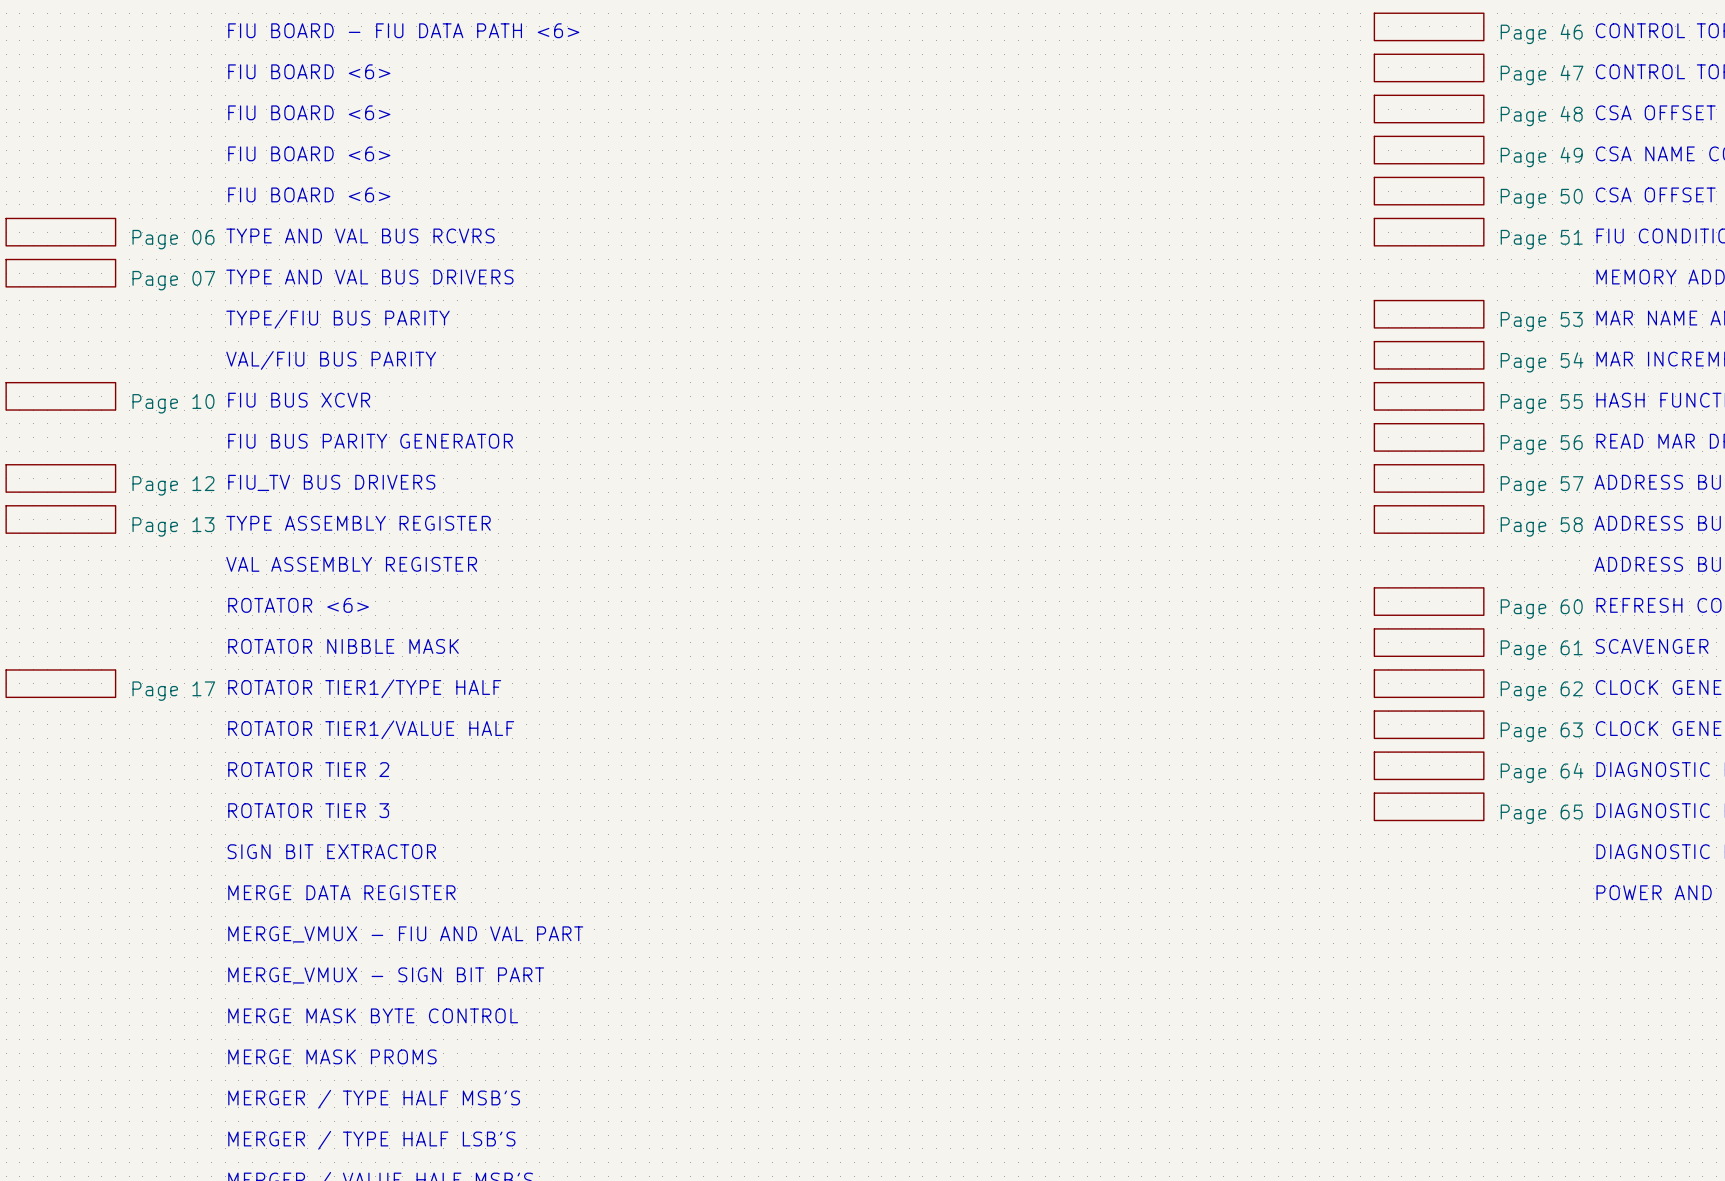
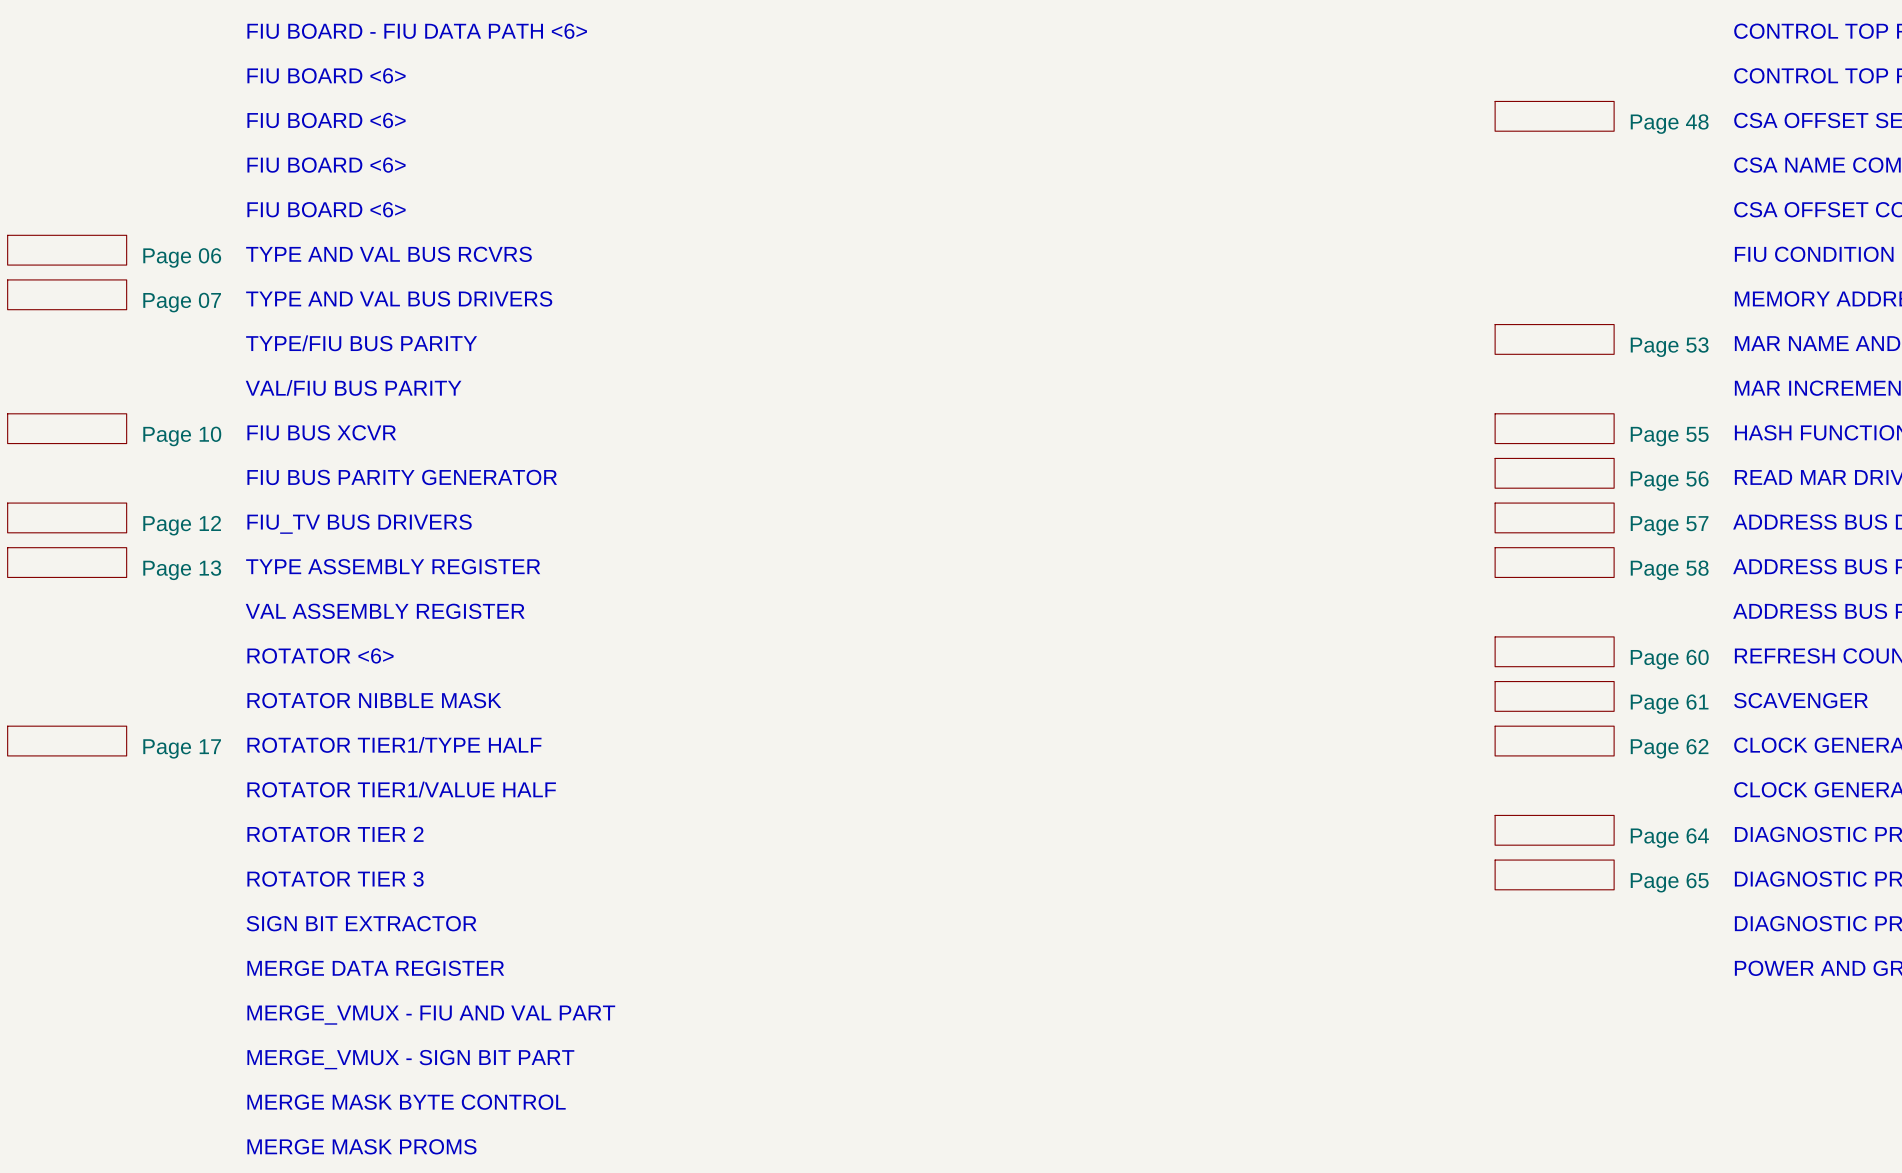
sheet Page 46: (1429, 26) -> none
sheet Page 47: (1429, 67) -> none
sheet Page 49: (1429, 150) -> none
sheet Page 50: (1429, 191) -> none
sheet Page 51: (1429, 232) -> none
sheet Page 54: (1429, 355) -> none
sheet Page 63: (1429, 724) -> none

